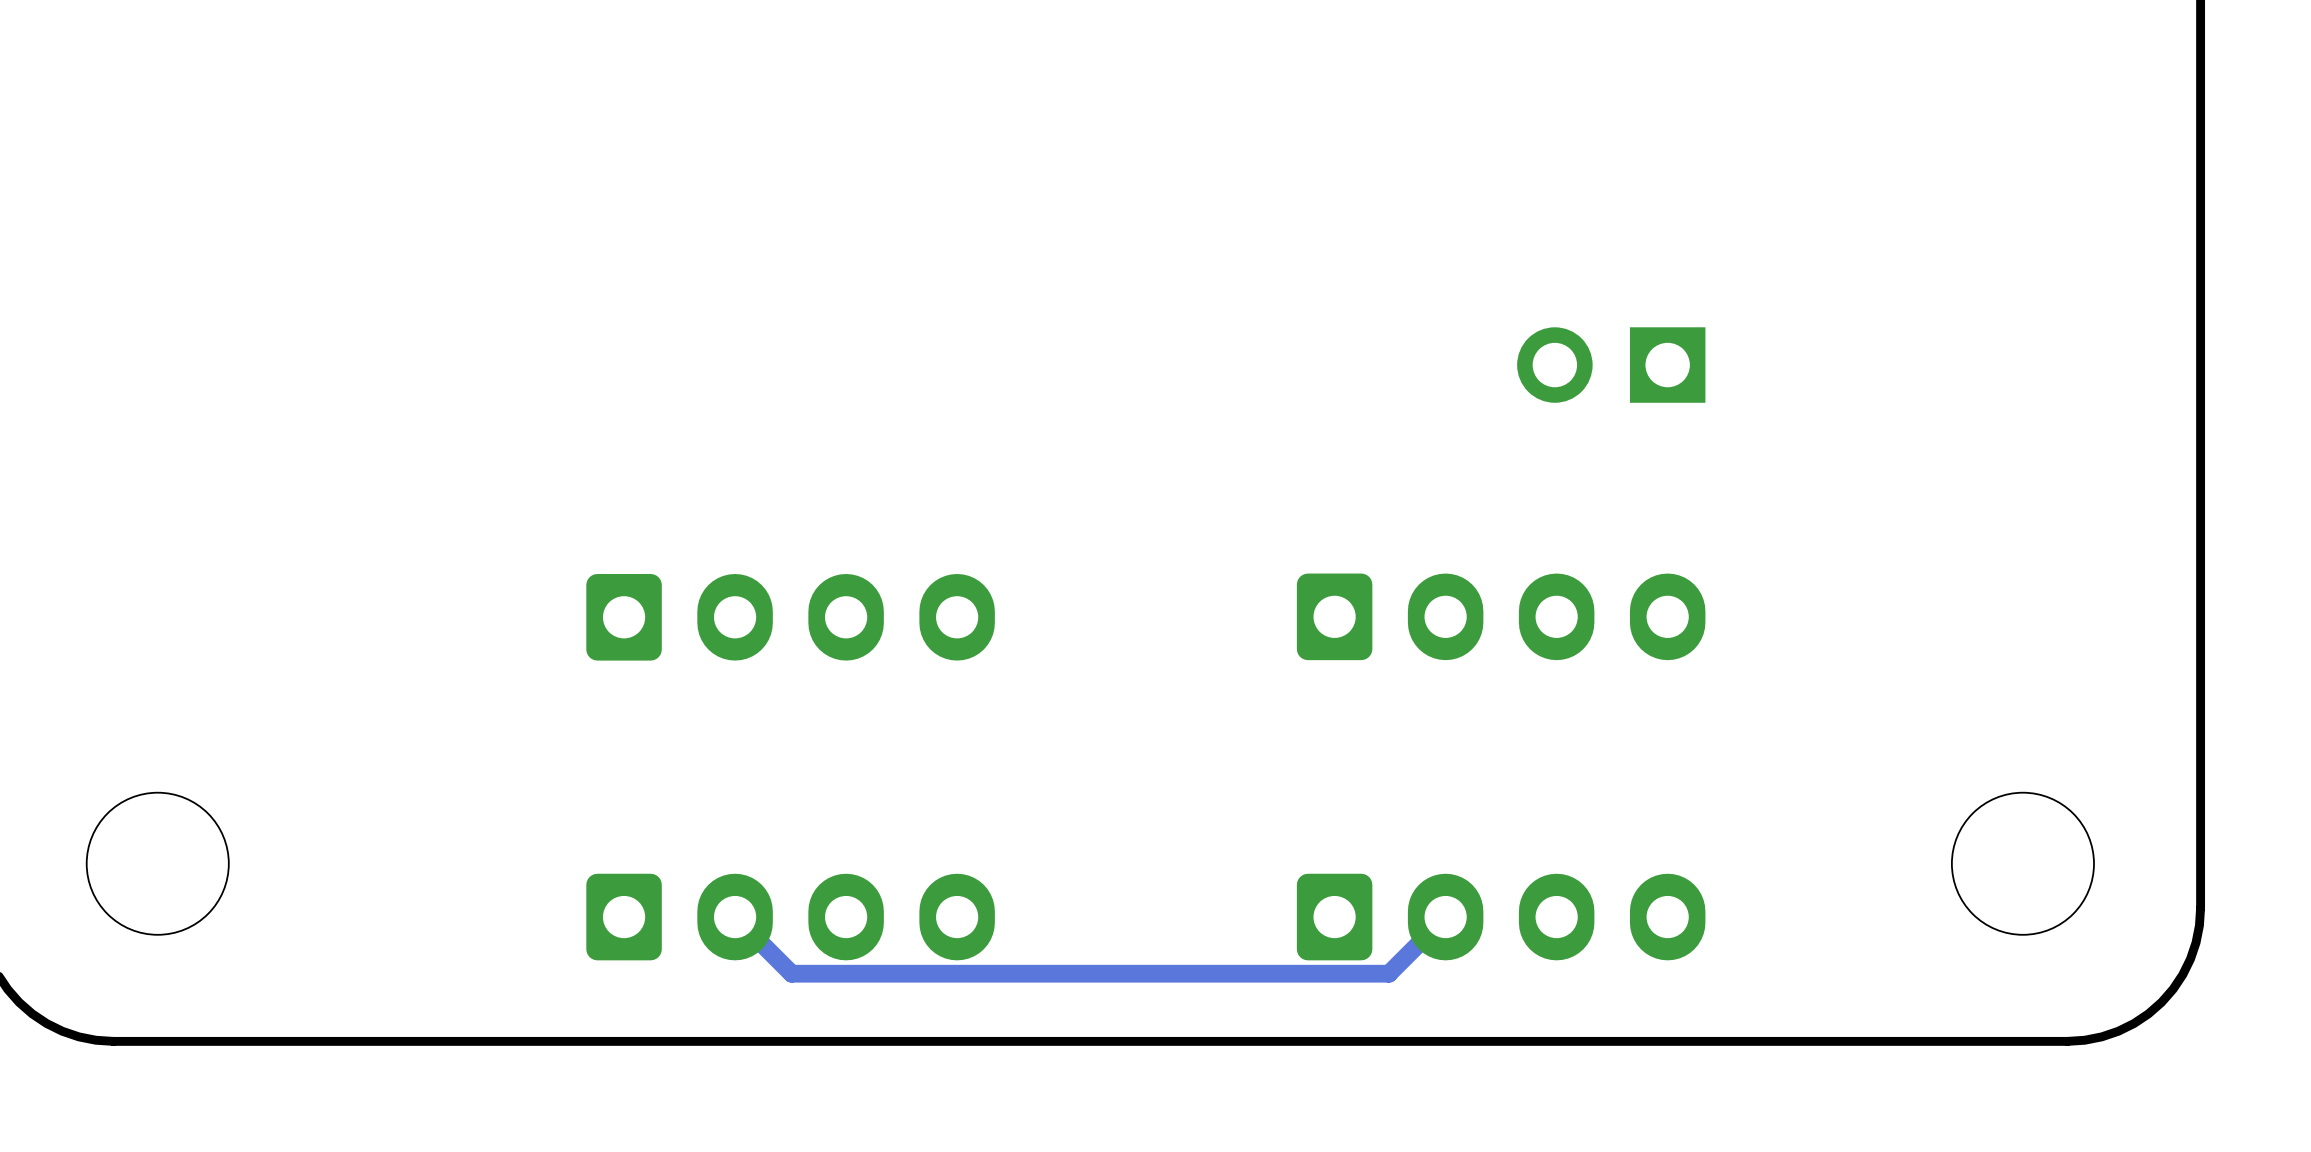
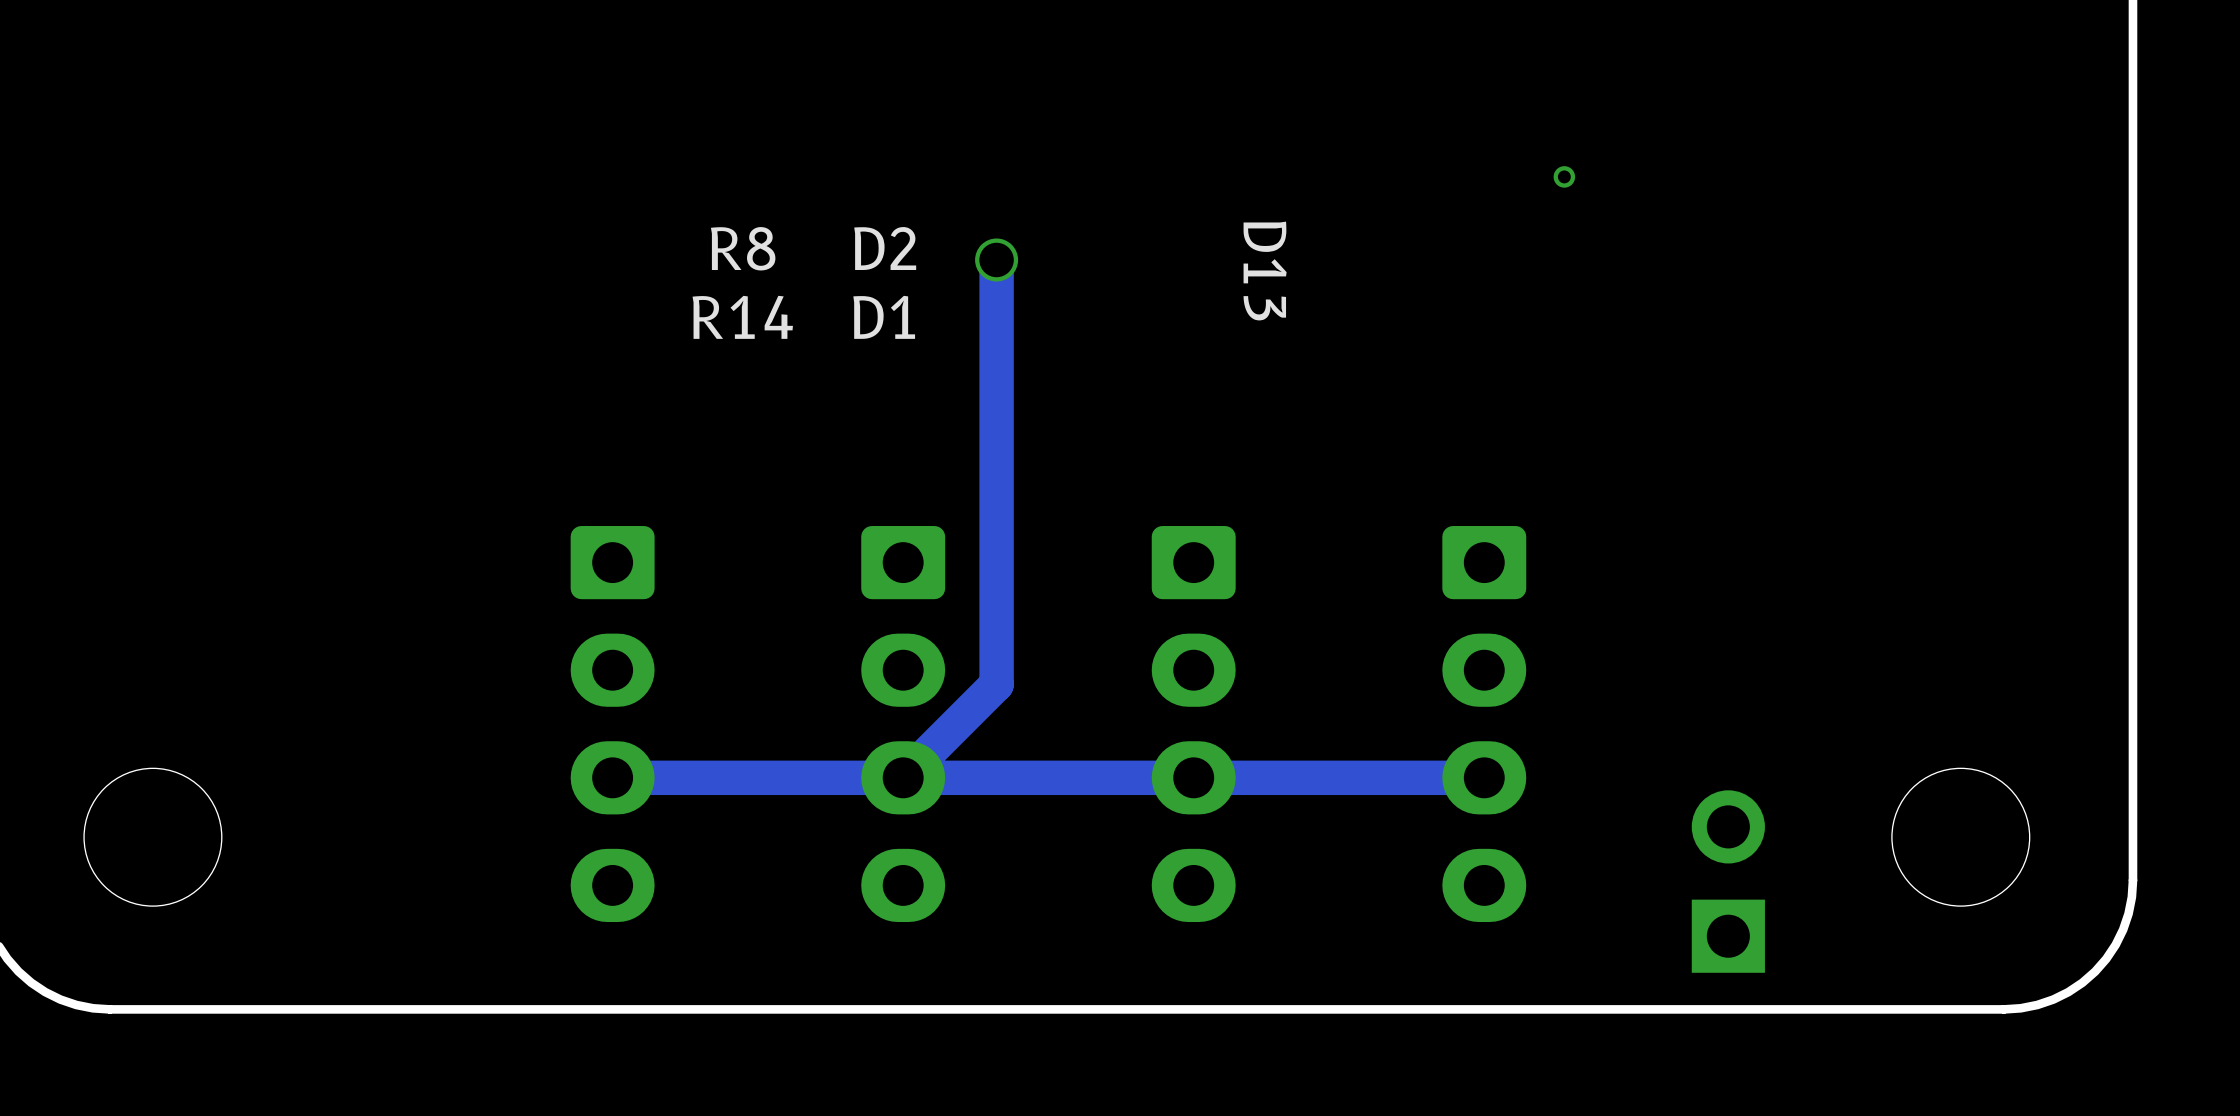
via: none -> (1564, 176)
R8: none -> (743, 248)
D2: none -> (885, 248)
track: none -> (996, 259) (996, 684) (903, 777)
via: none -> (996, 259)
D13: none -> (1265, 271)
R14: none -> (742, 317)
D1: none -> (884, 317)
part rotation: 0° (1611, 365) -> 90° clockwise (1728, 881)
part position: (1611, 365) -> (1728, 881)
part: (1501, 616) -> none
part: (790, 617) -> none
part: none -> (612, 724)
part: none -> (903, 724)
part: none -> (1193, 724)
part: none -> (1484, 724)
track: none -> (1484, 777) (612, 777)
part: (790, 917) -> none
track: (1445, 917) (1388, 973) (791, 973) (735, 917) -> none
part: (1501, 917) -> none

